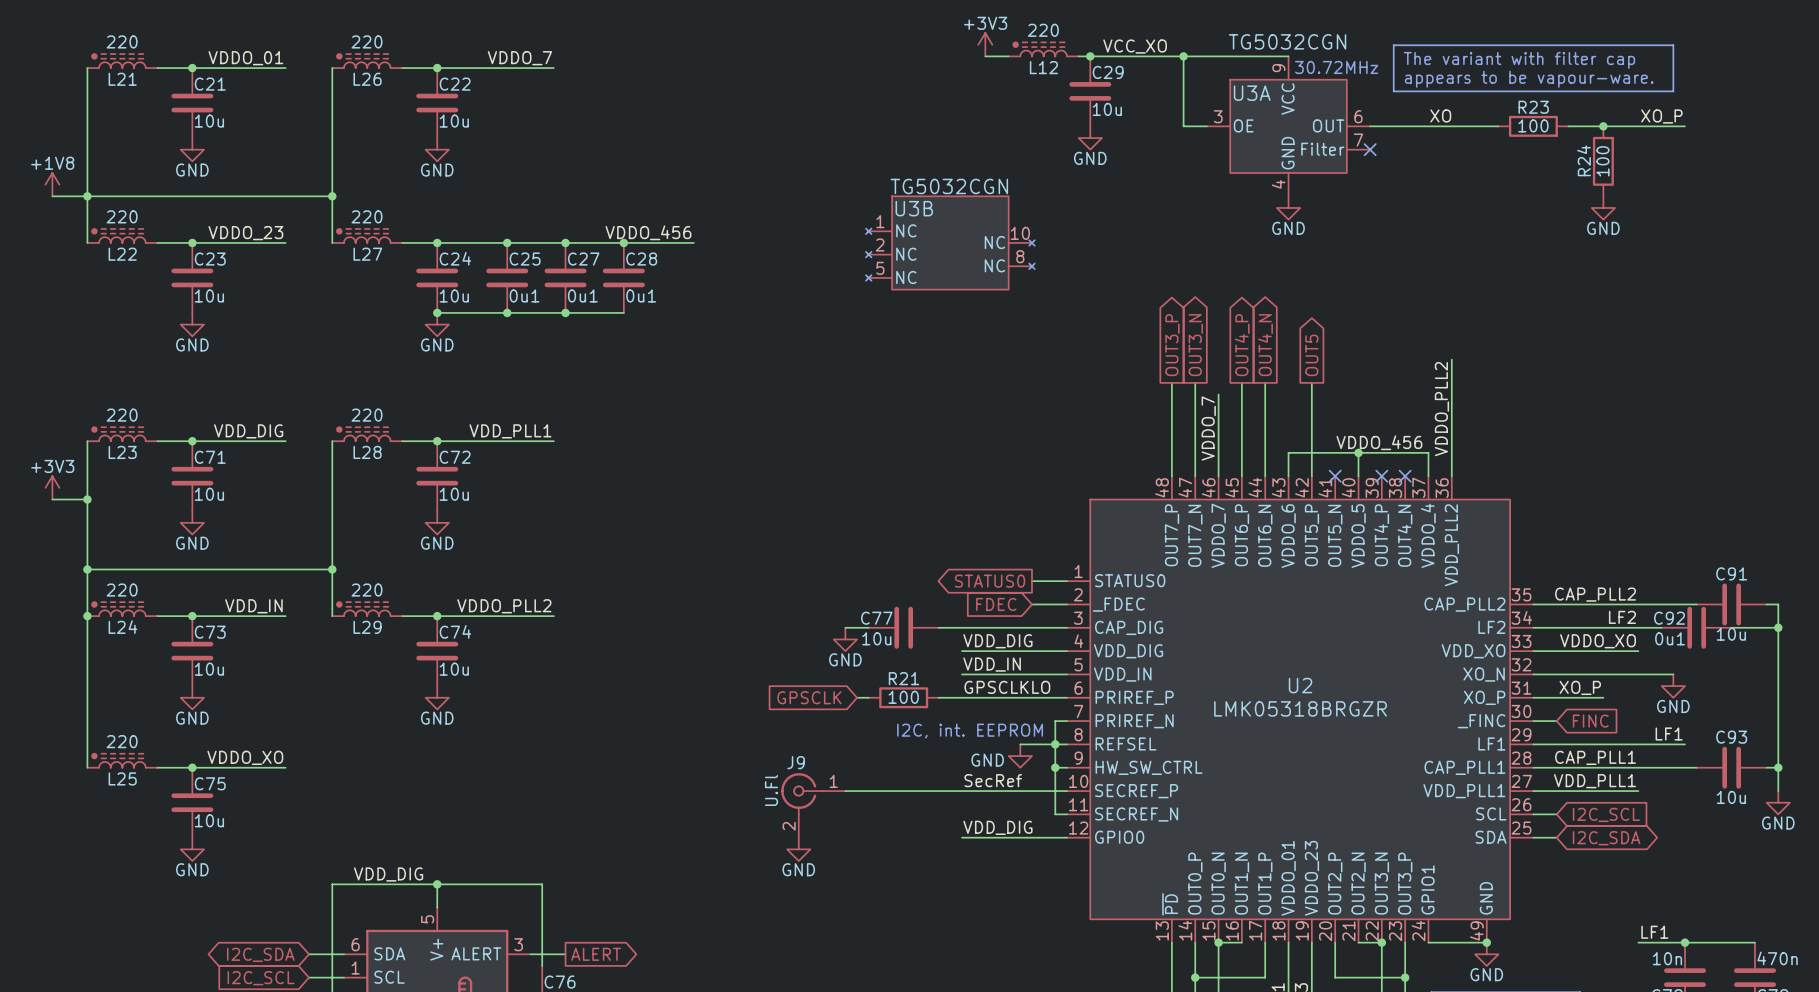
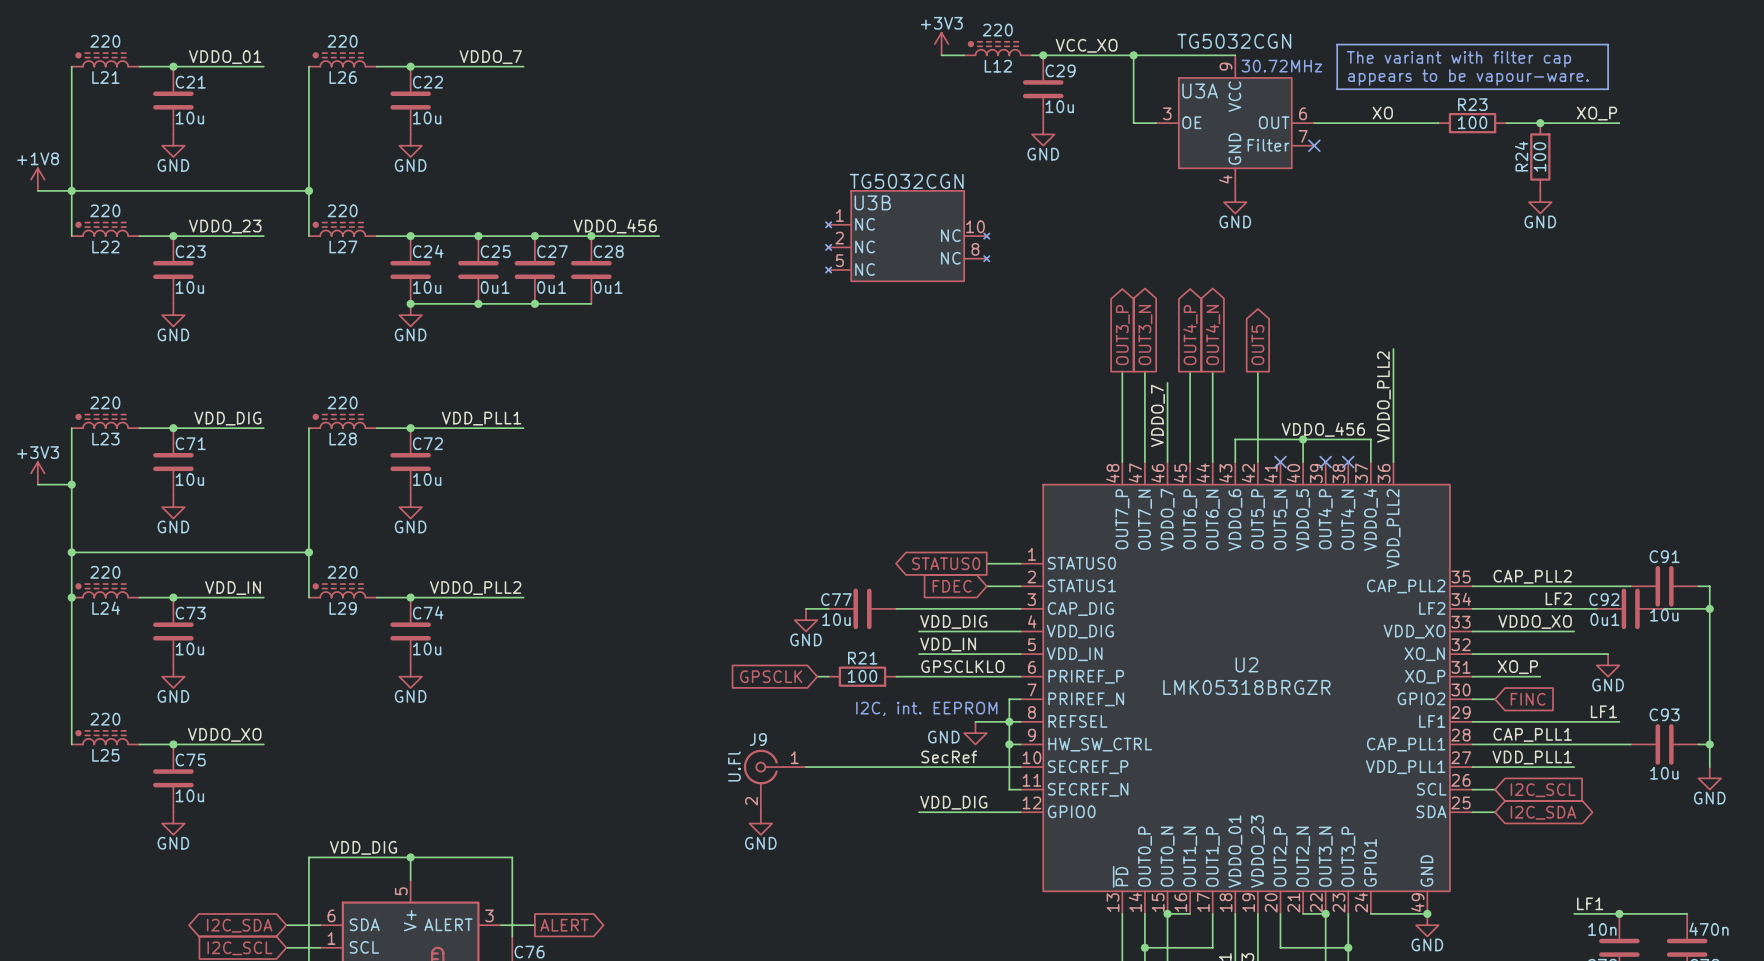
U2 pin name: _FDEC (1118, 604) -> STATUS1 (1081, 585)
U2 pin name: _FINC (1481, 721) -> GPIO2 (1421, 698)

